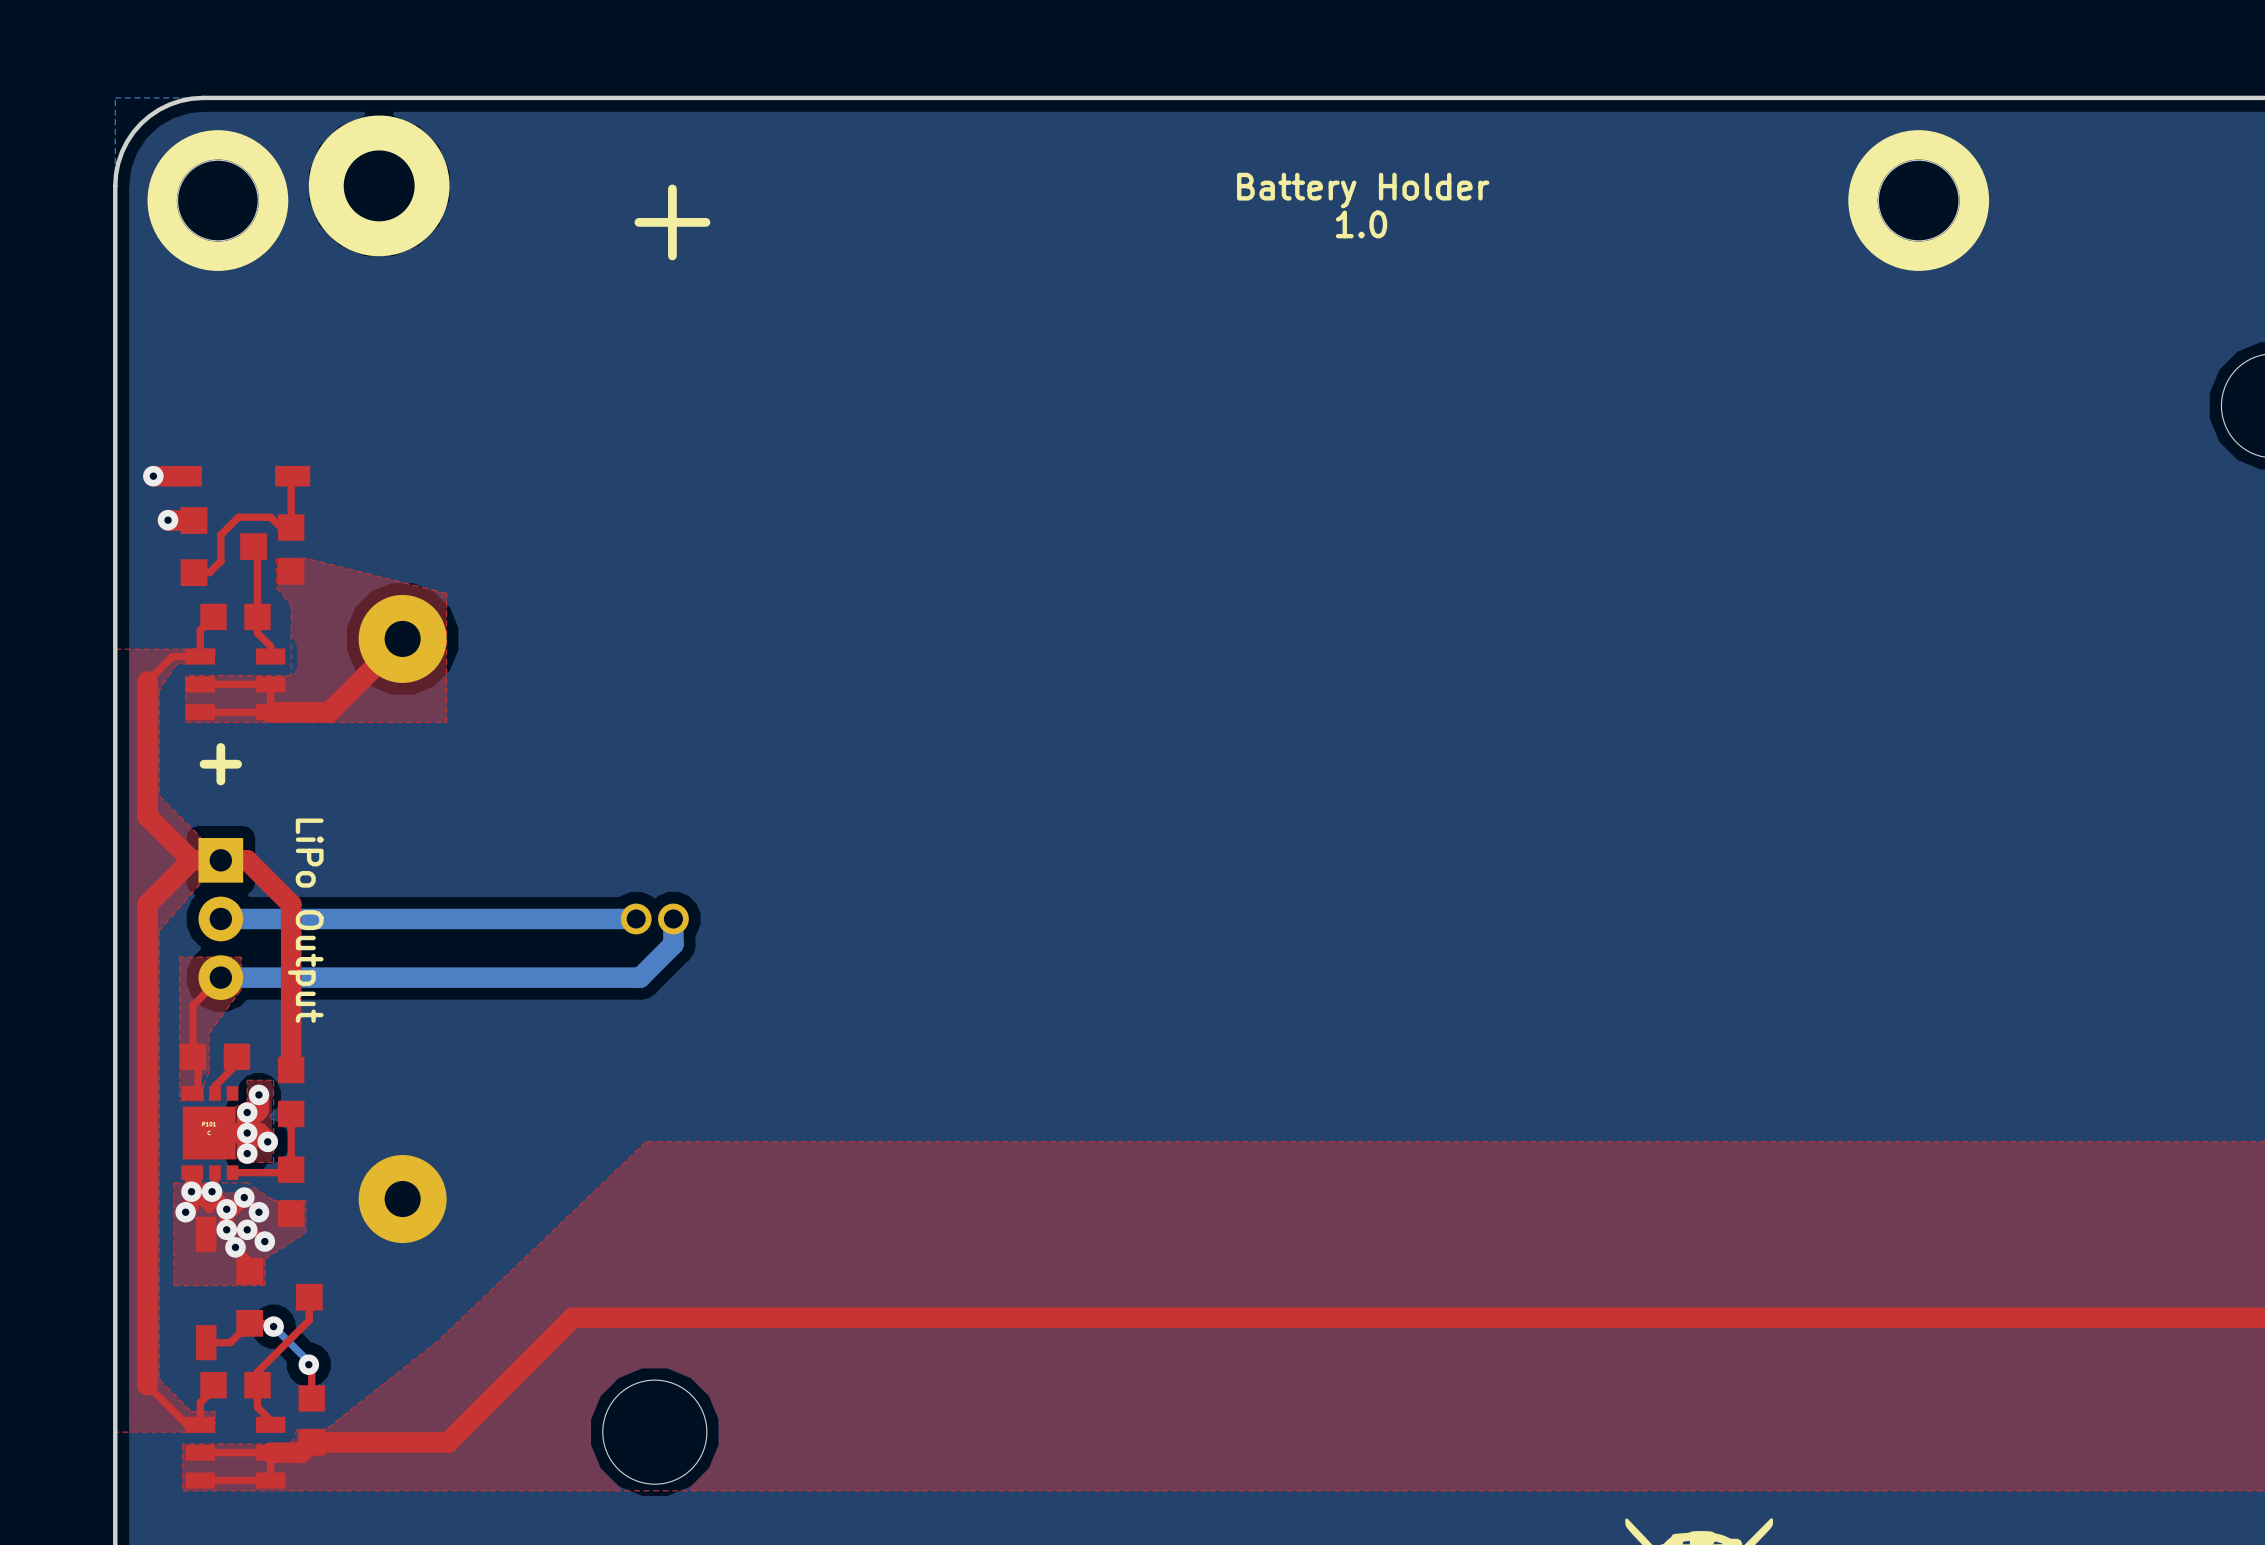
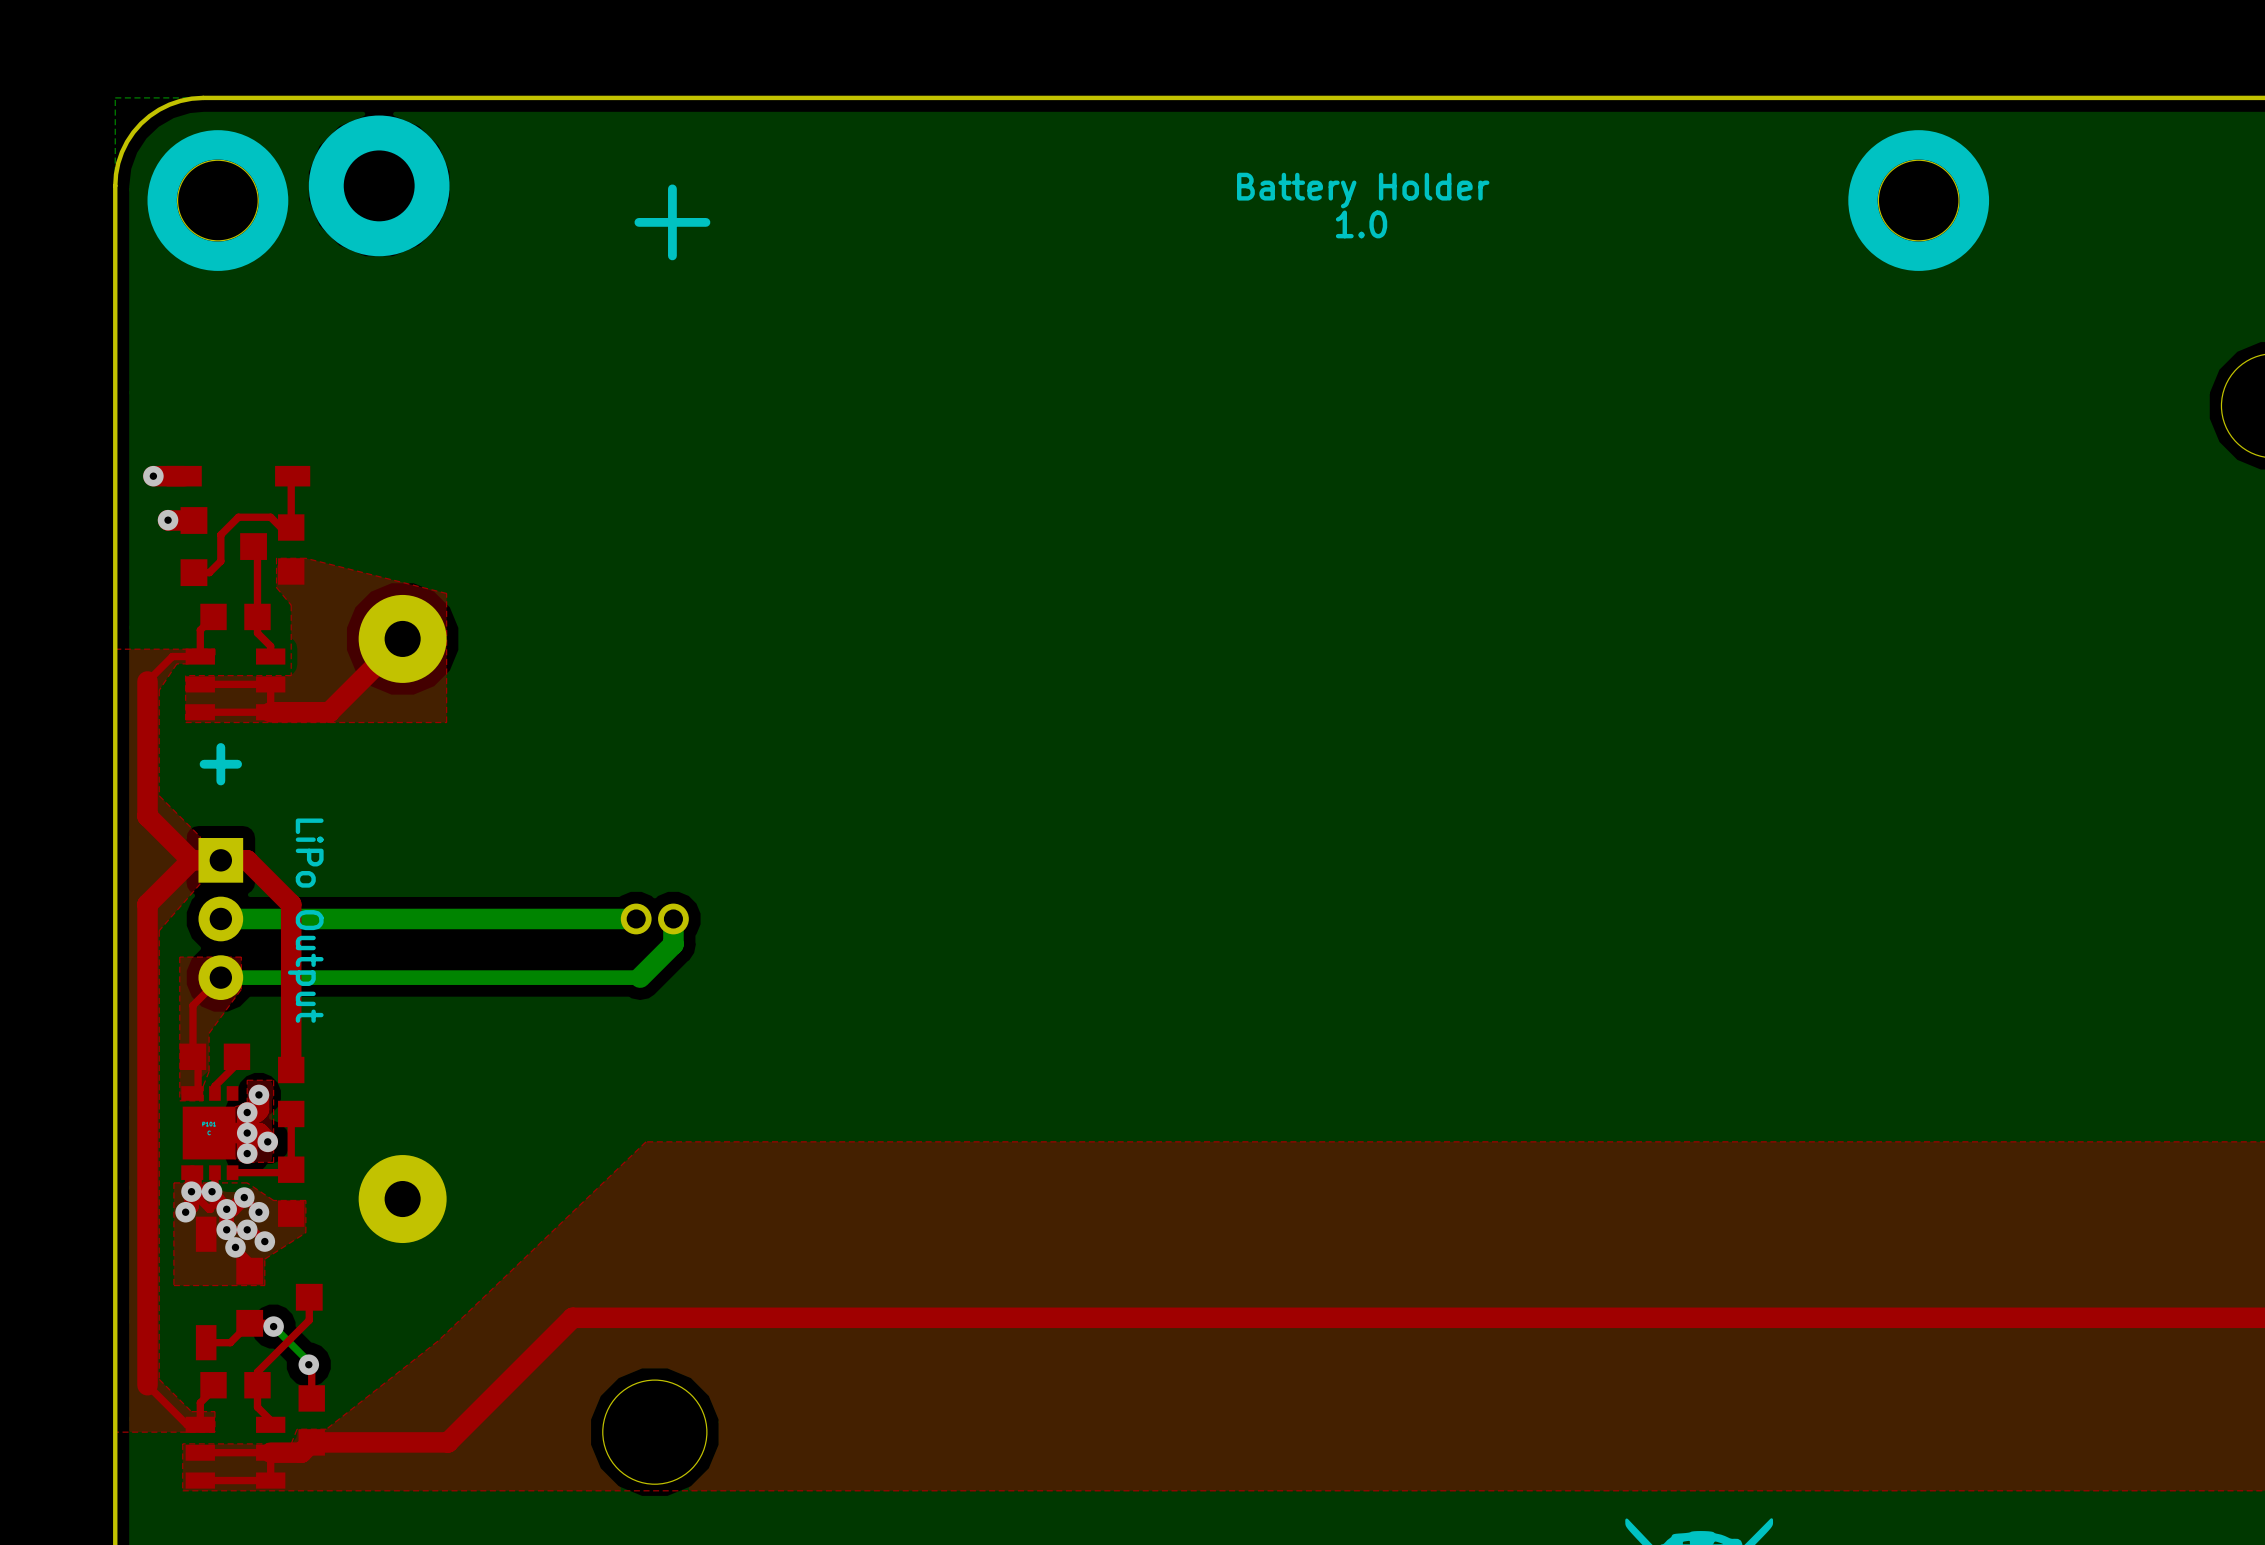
bottom track width: thick (220, 977) (640, 977) -> thin (220, 977) (640, 977)

